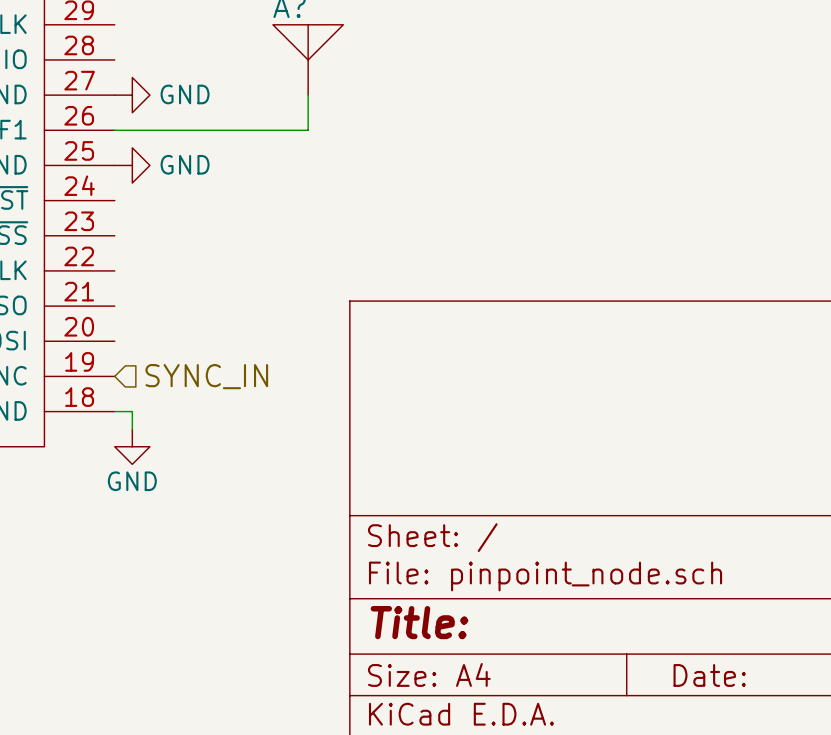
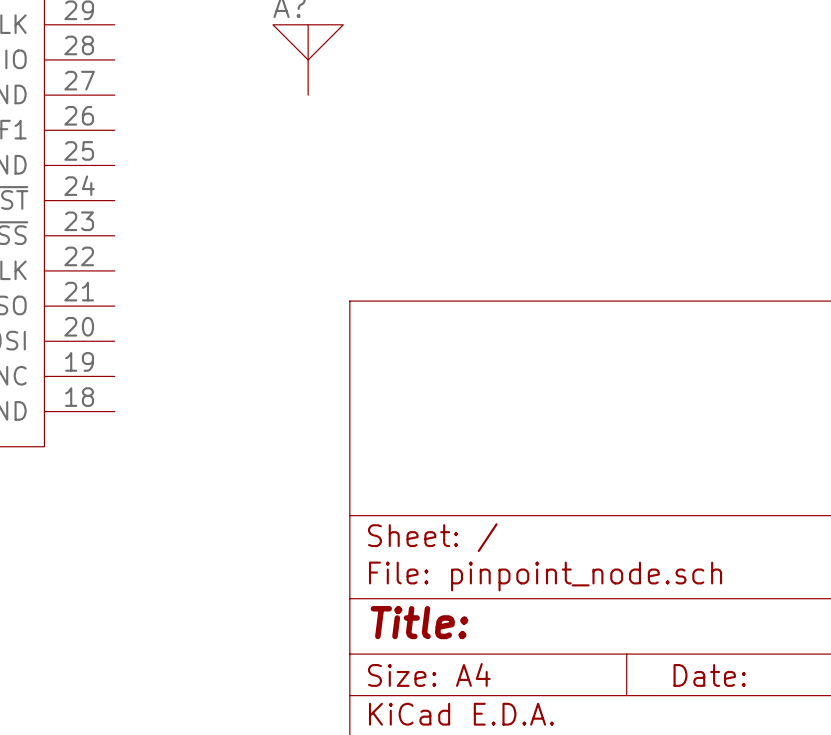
power symbol: GND (132, 95) -> none
wire: (308, 95) (308, 130) (114, 130) -> none
power symbol: GND (132, 165) -> none
hierarchical label: SYNC_IN (206, 376) -> none
wire: (114, 411) (132, 411) (132, 429) -> none
power symbol: GND (132, 446) -> none

